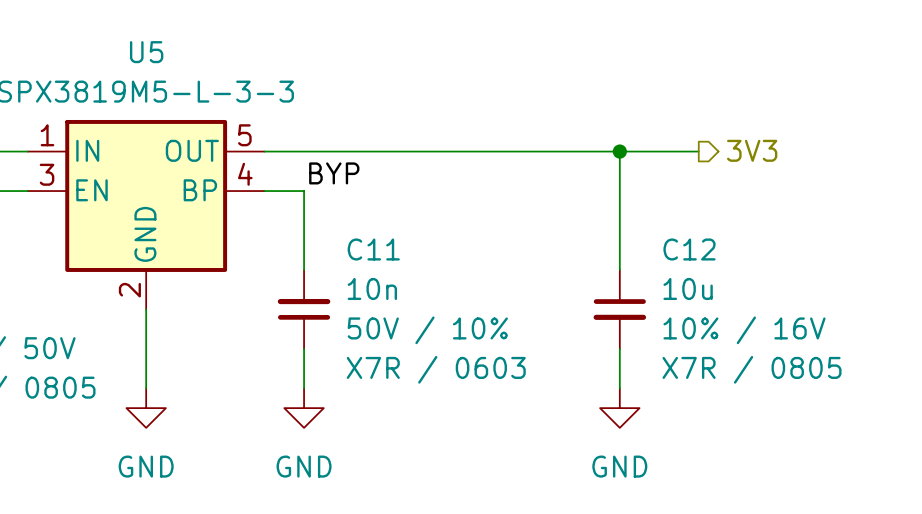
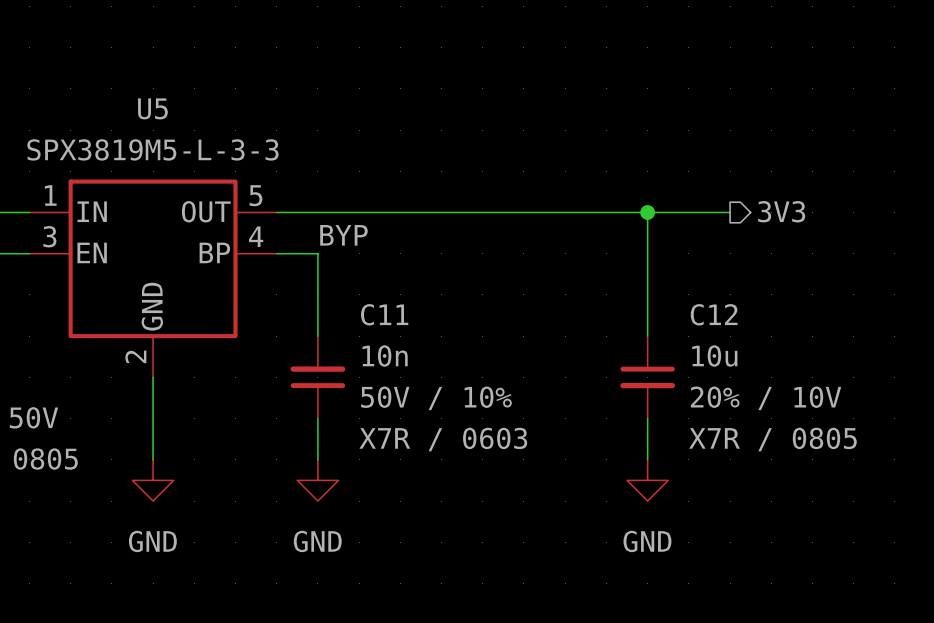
C12 text: 10% / 16V (744, 330) -> 20% / 10V (766, 398)

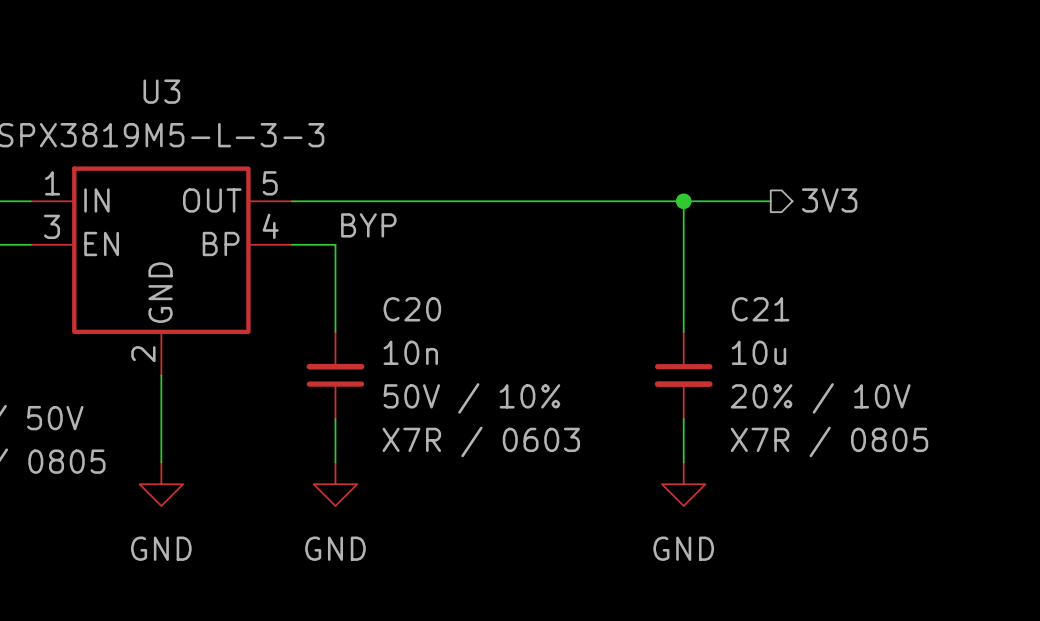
U5 name: U5 (152, 108) -> U3 (161, 91)
C11 name: C11 (384, 314) -> C20 (412, 309)
C12 name: C12 (714, 314) -> C21 (760, 309)

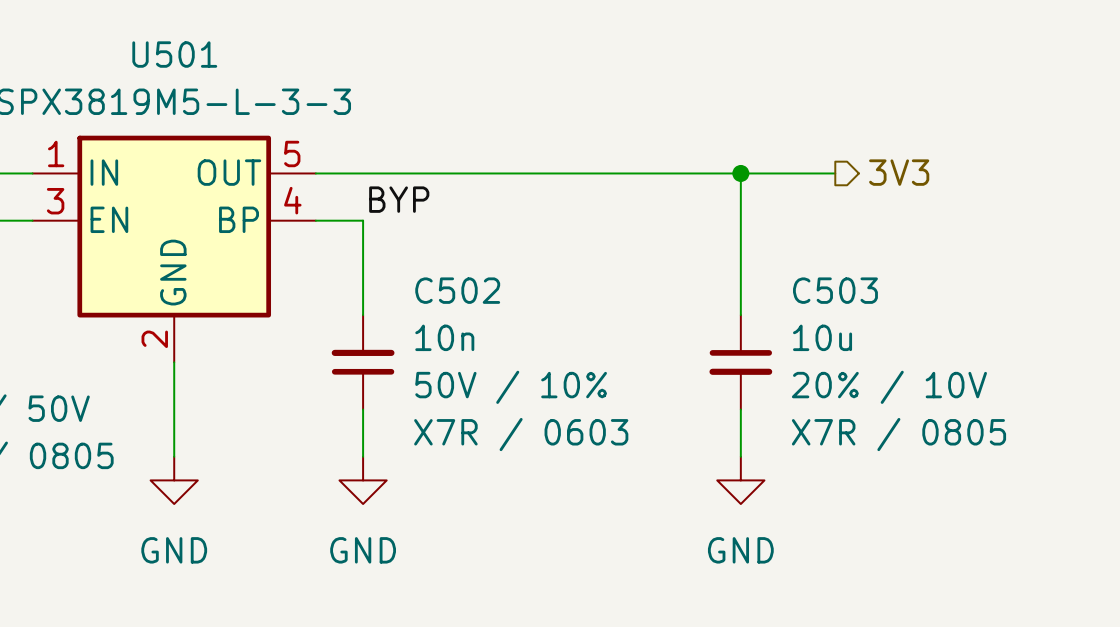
U3 name: U3 (161, 91) -> U501 (174, 54)
C20 name: C20 (412, 309) -> C502 (457, 290)
C21 name: C21 (760, 309) -> C503 (835, 290)

